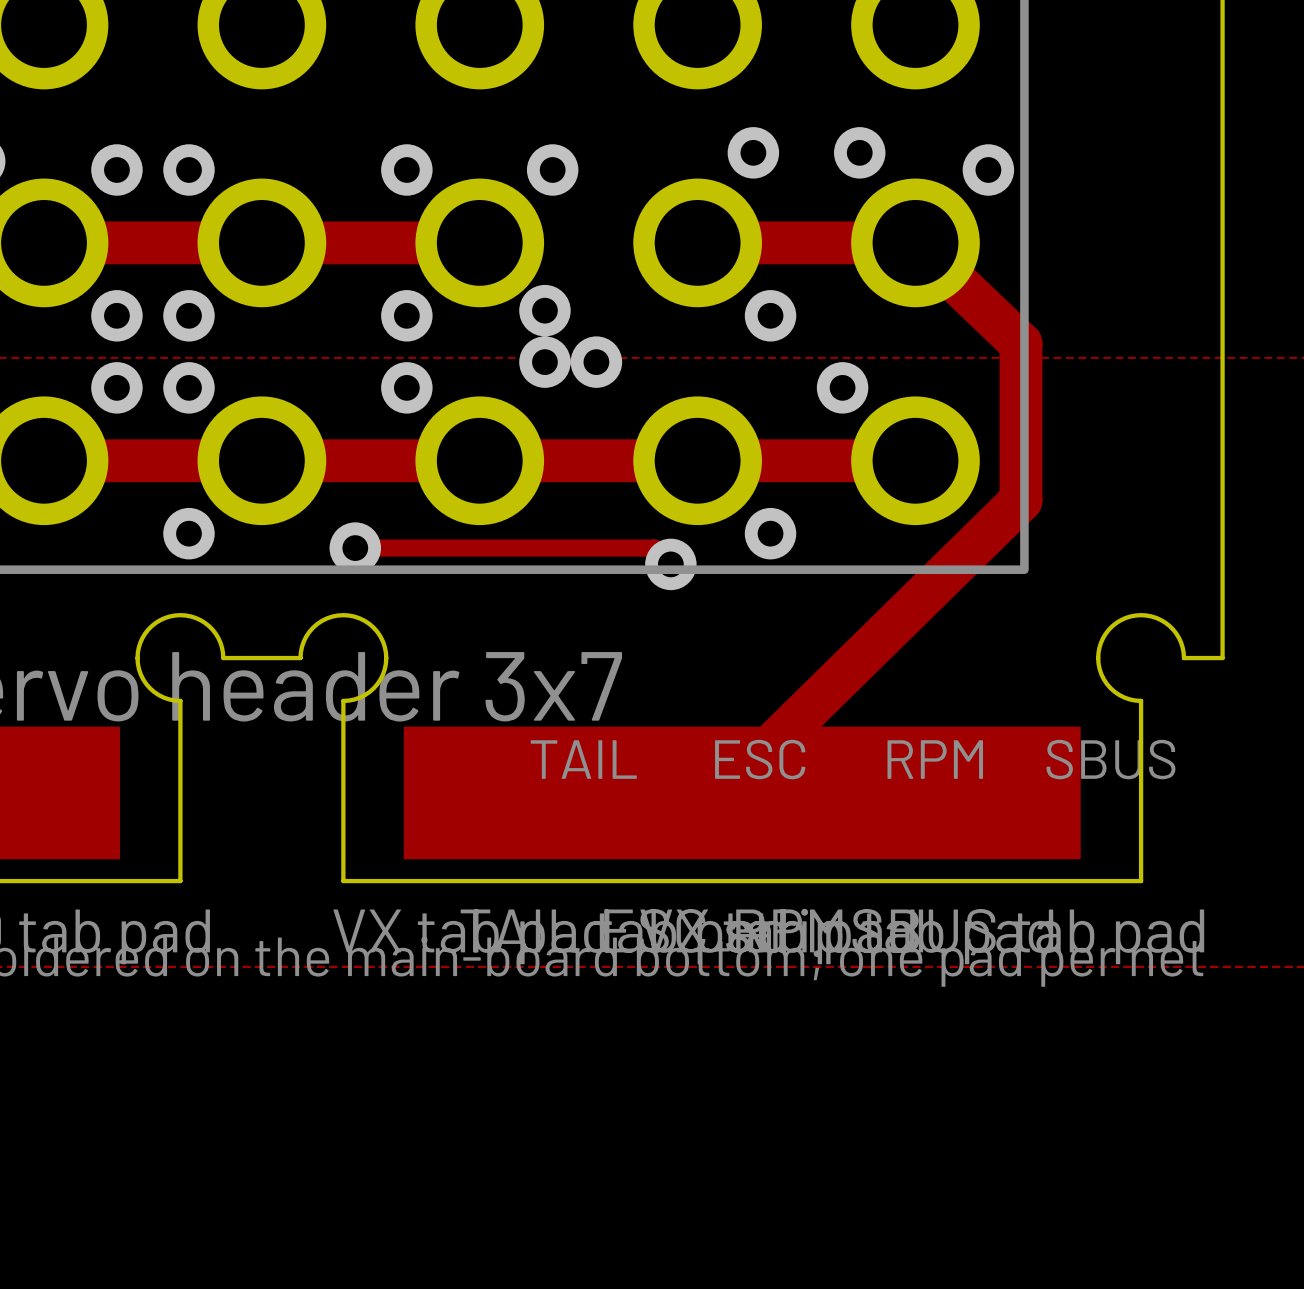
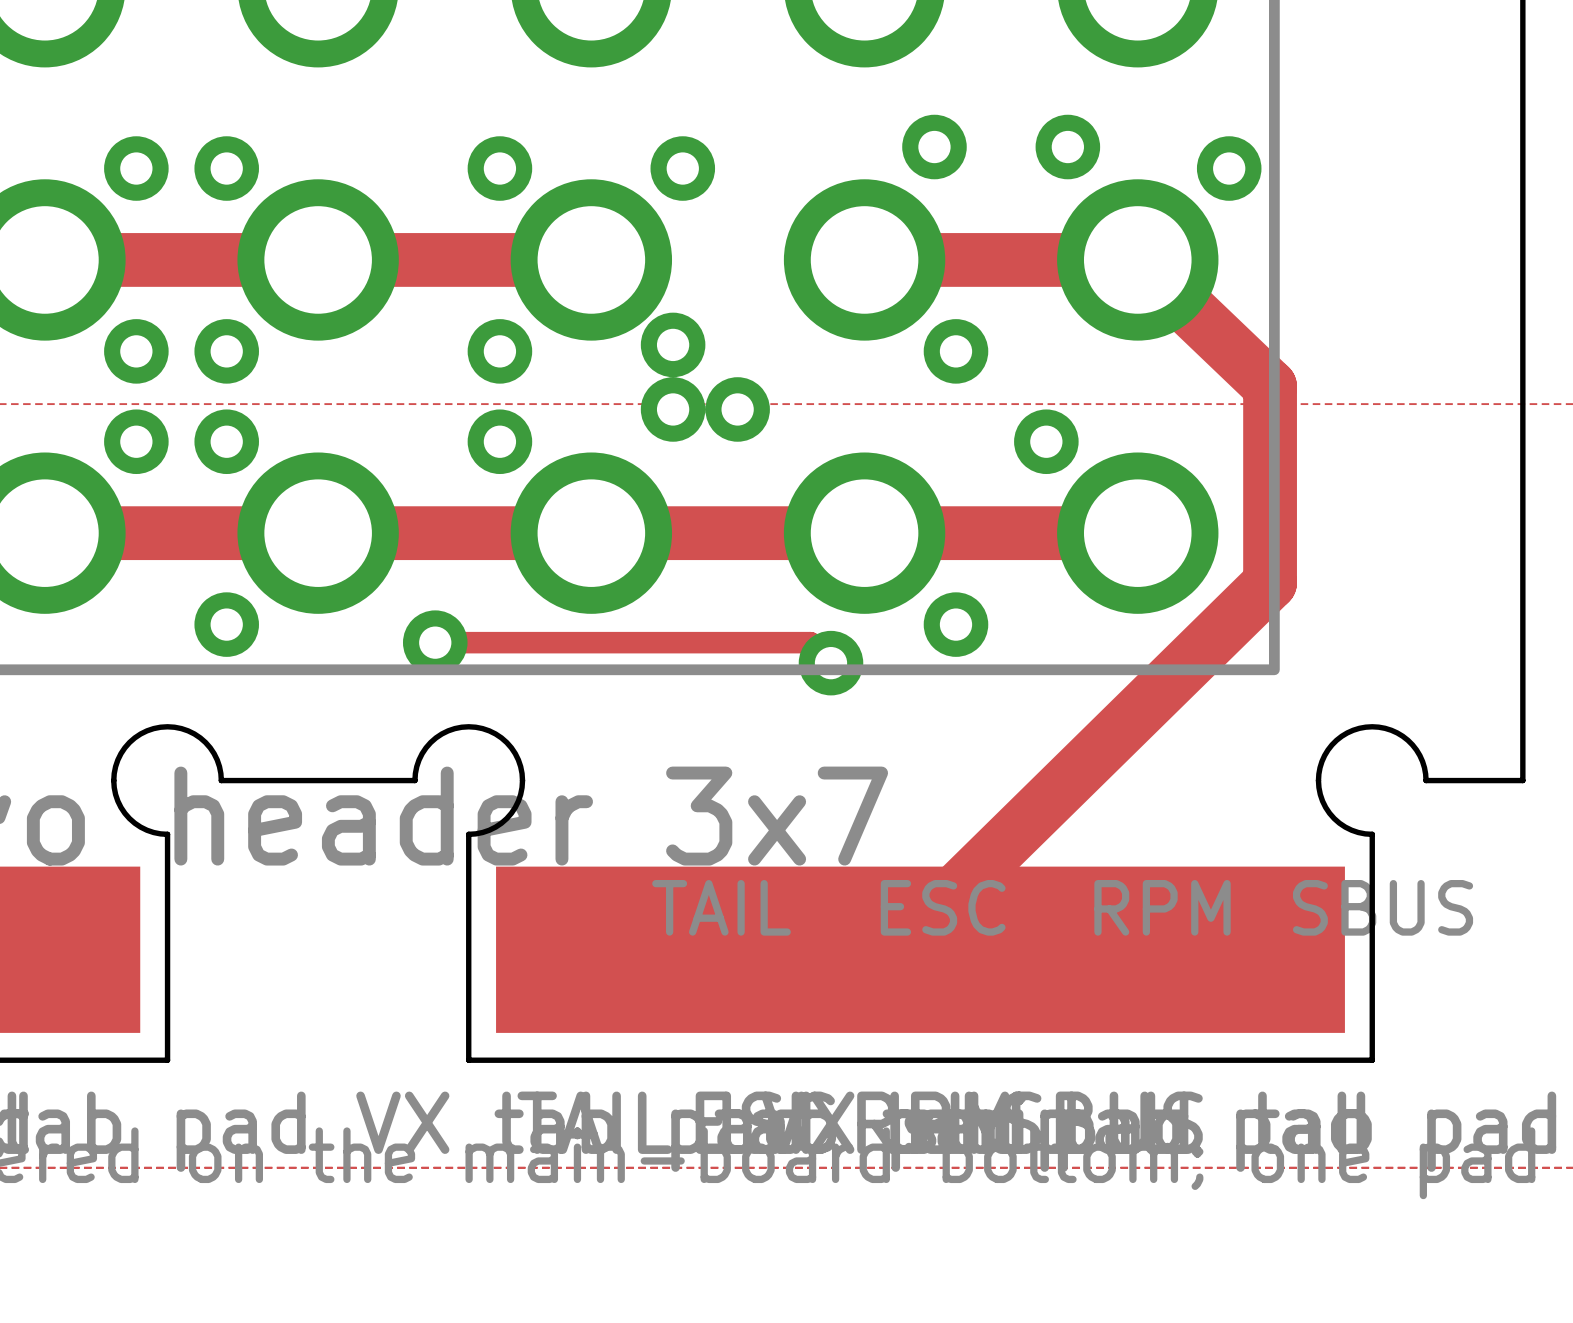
board edge: (223, 658) (220, 642) (212, 629) (200, 620) (185, 615) (175, 615) (160, 620) (148, 629) (140, 642) (137, 663) (146, 684) (163, 697) (180, 700) (180, 881) (141, 881) -> (269, 780) (221, 780) (217, 759) (205, 742) (188, 730) (174, 727) (160, 727) (140, 733) (129, 742) (117, 759) (113, 780) (115, 794) (120, 807) (129, 818) (140, 827) (153, 832) (167, 834) (167, 1060)
board edge: (300, 658) (303, 641) (313, 627) (321, 620) (337, 615) (348, 615) (364, 620) (373, 627) (383, 641) (386, 658) (380, 679) (364, 695) (343, 700) (343, 881) (381, 881) -> (366, 780) (414, 780) (419, 759) (430, 742) (448, 730) (461, 727) (475, 727) (495, 733) (506, 742) (518, 759) (522, 780) (520, 794) (515, 807) (506, 818) (495, 827) (482, 832) (468, 834) (468, 1060)
board edge: (1183, 658) (1182, 647) (1176, 633) (1165, 622) (1151, 616) (1135, 615) (1121, 620) (1108, 629) (1100, 642) (1098, 663) (1107, 684) (1124, 697) (1141, 700) (1141, 881) (1102, 881) -> (1474, 780) (1426, 780) (1422, 761) (1412, 744) (1397, 732) (1378, 727) (1365, 727) (1347, 732) (1332, 744) (1321, 761) (1318, 774) (1318, 787) (1322, 801) (1329, 813) (1345, 827) (1358, 832) (1372, 834) (1372, 1060)

